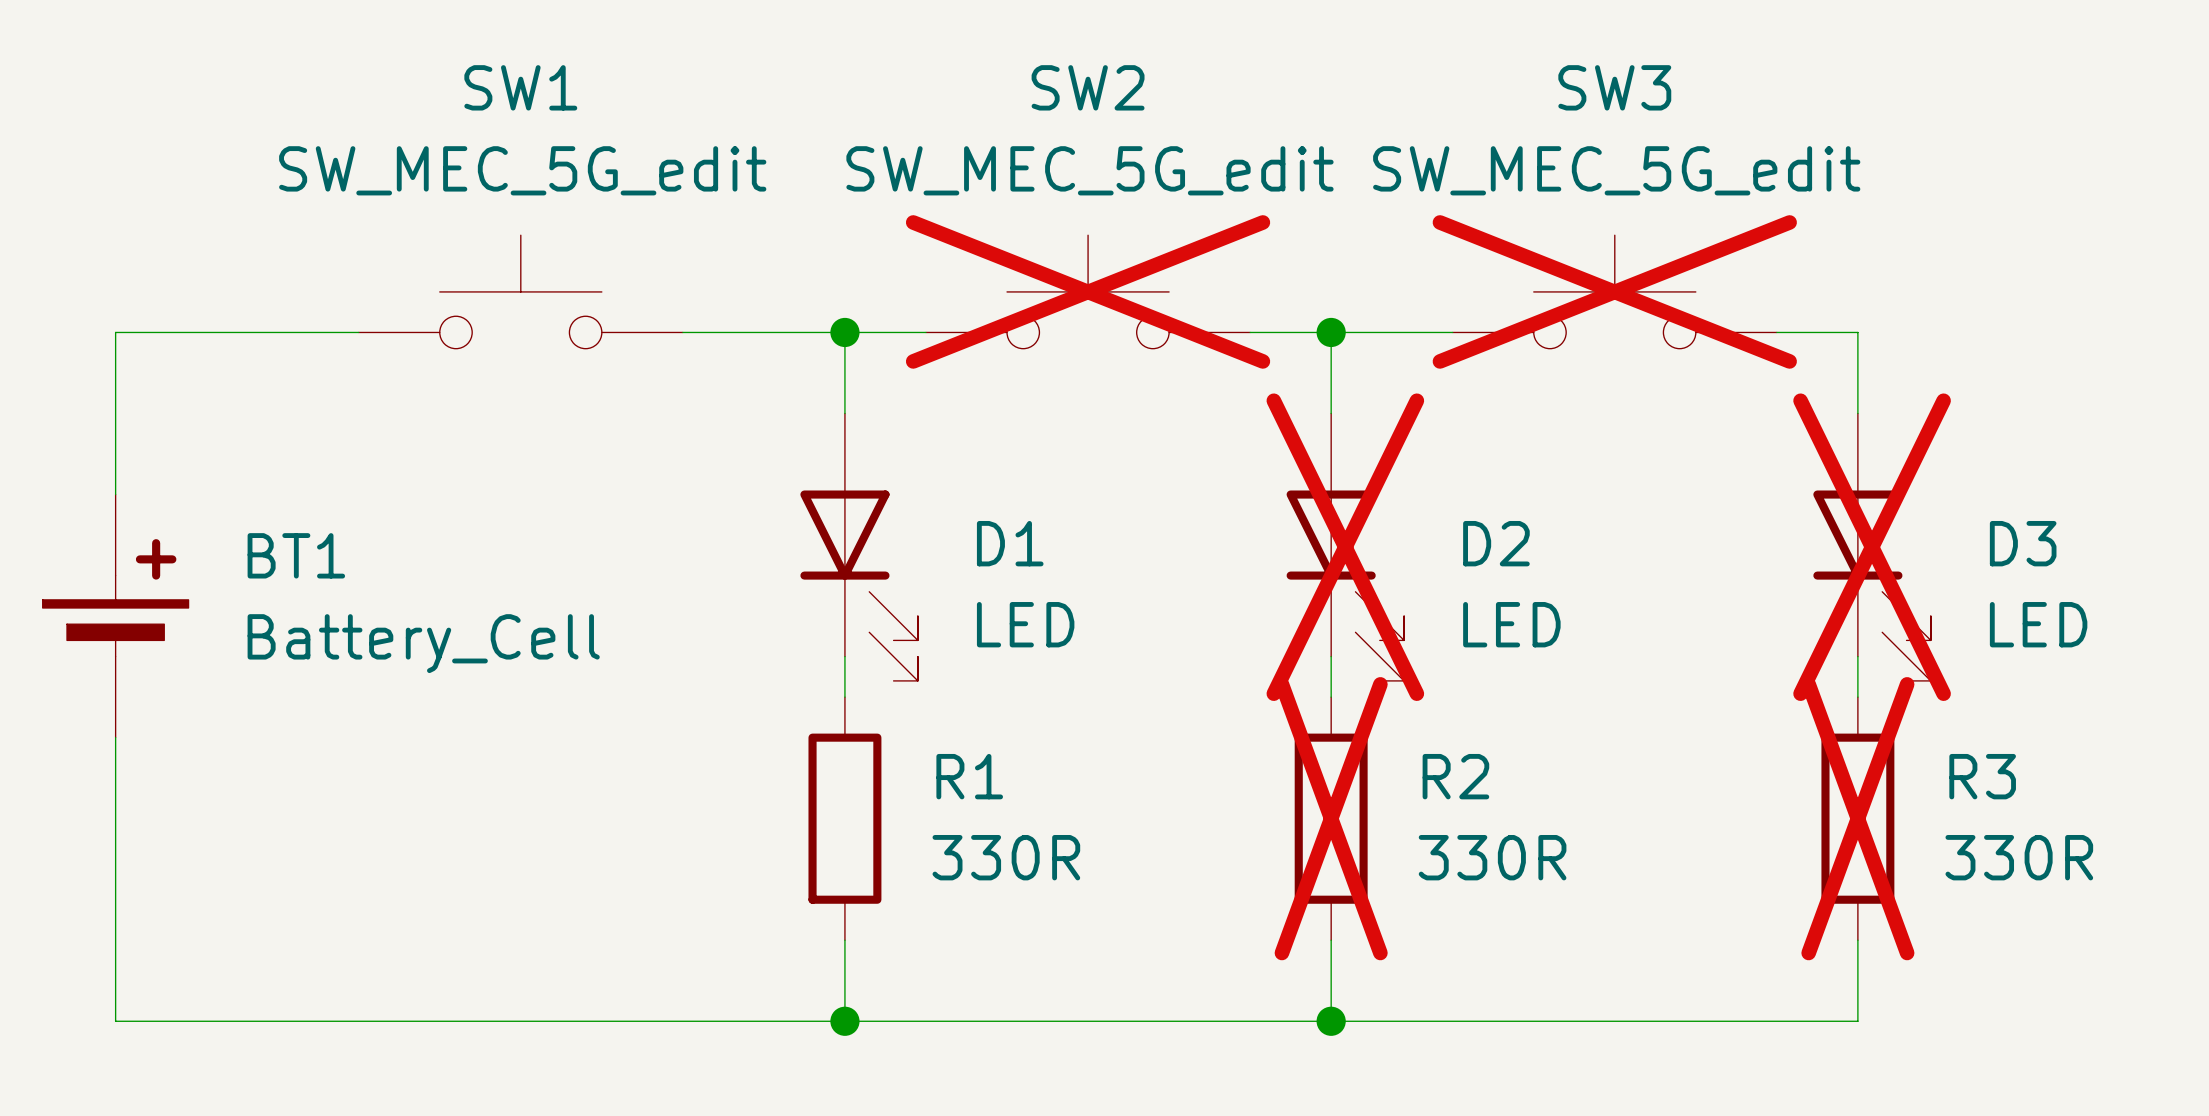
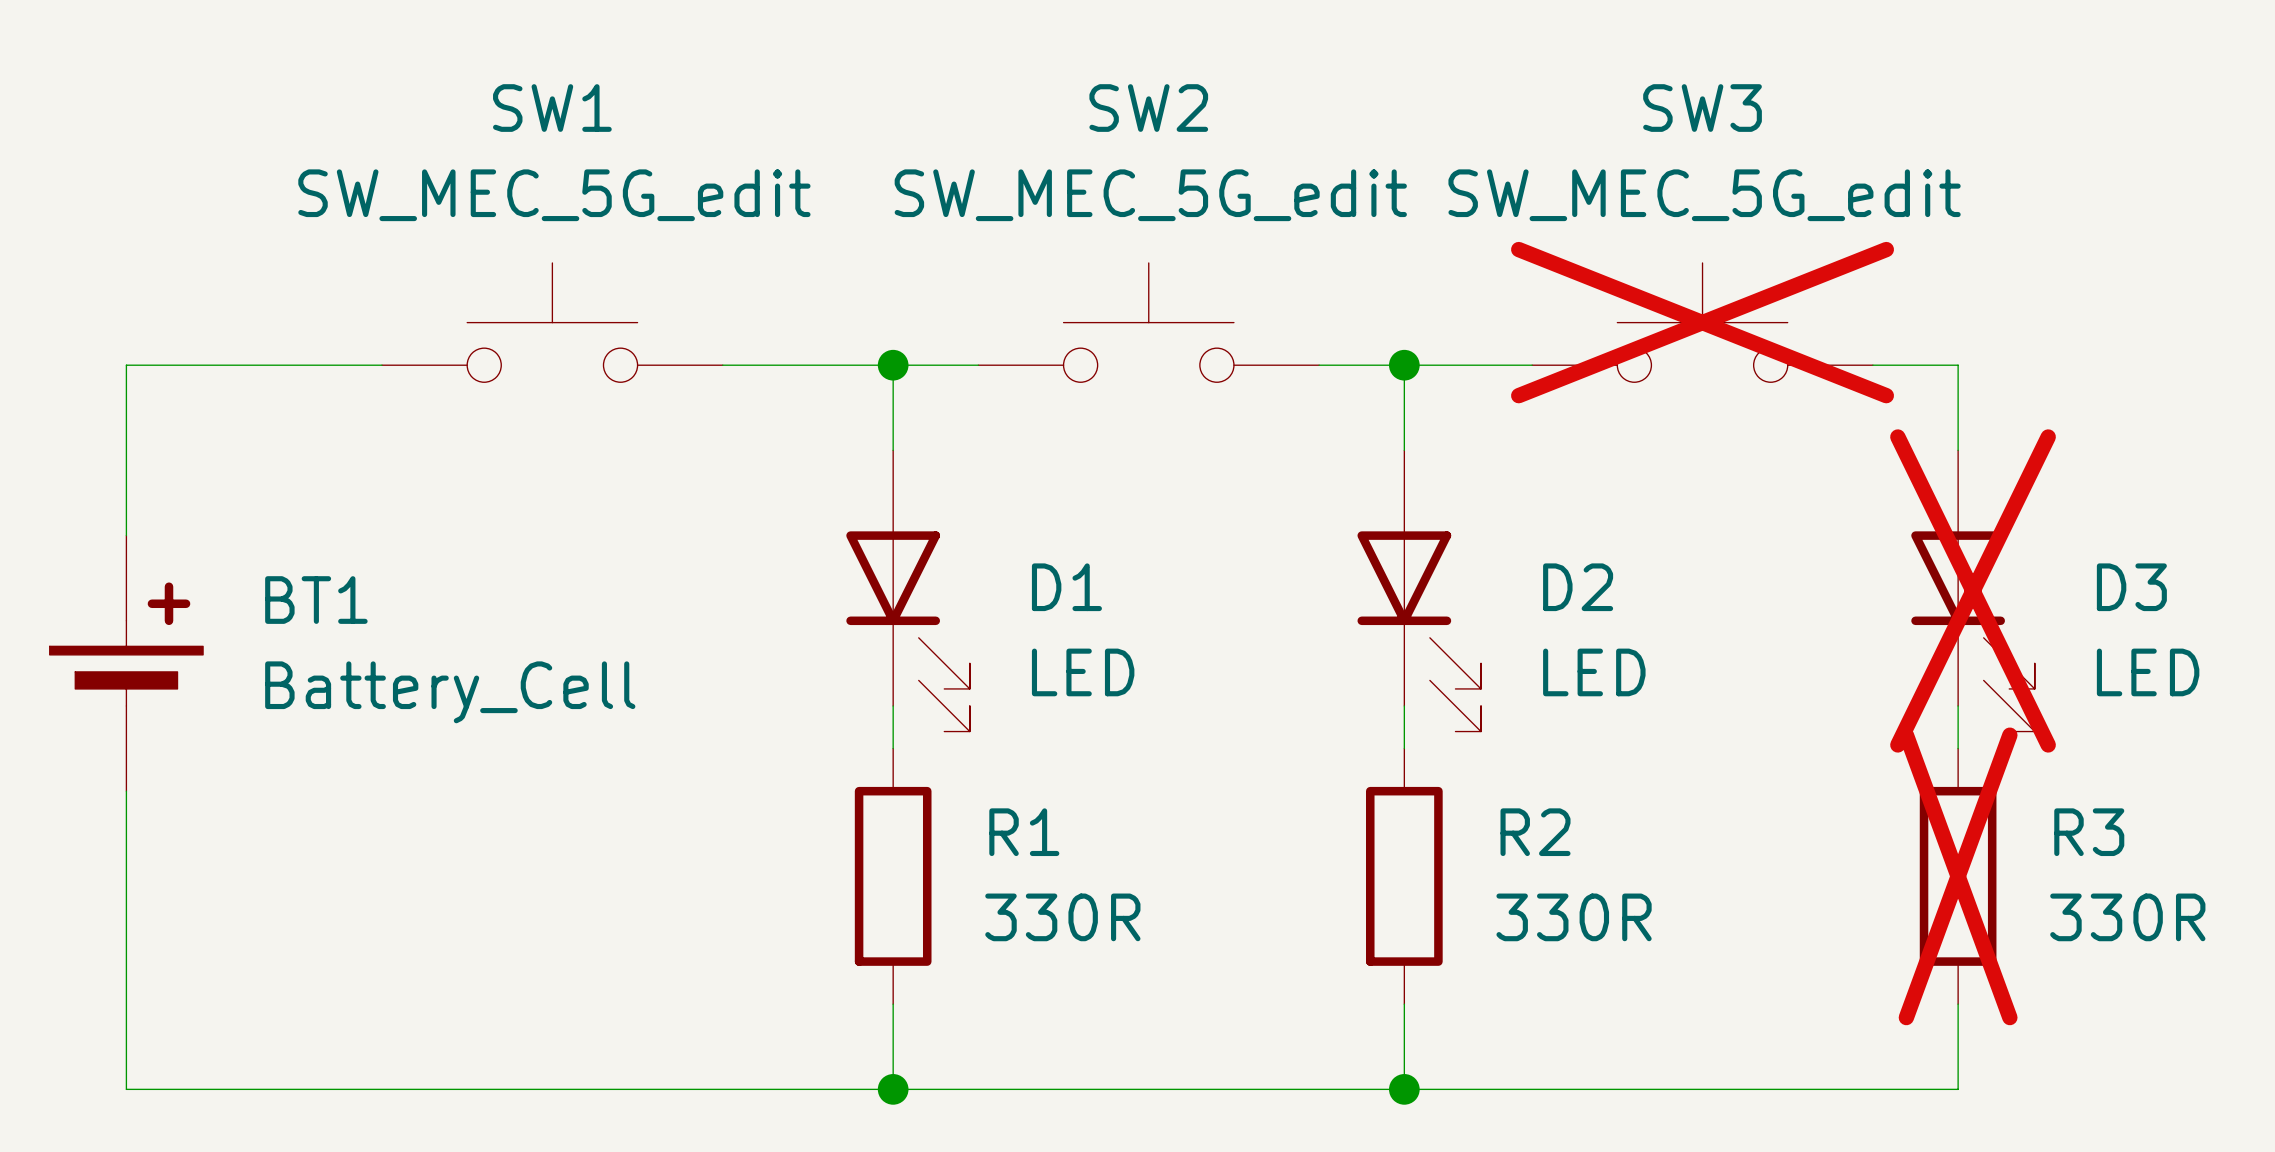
SW2 do-not-place cross: (1088, 291) -> none
D2 do-not-place cross: (1345, 547) -> none
R2 do-not-place cross: (1331, 818) -> none

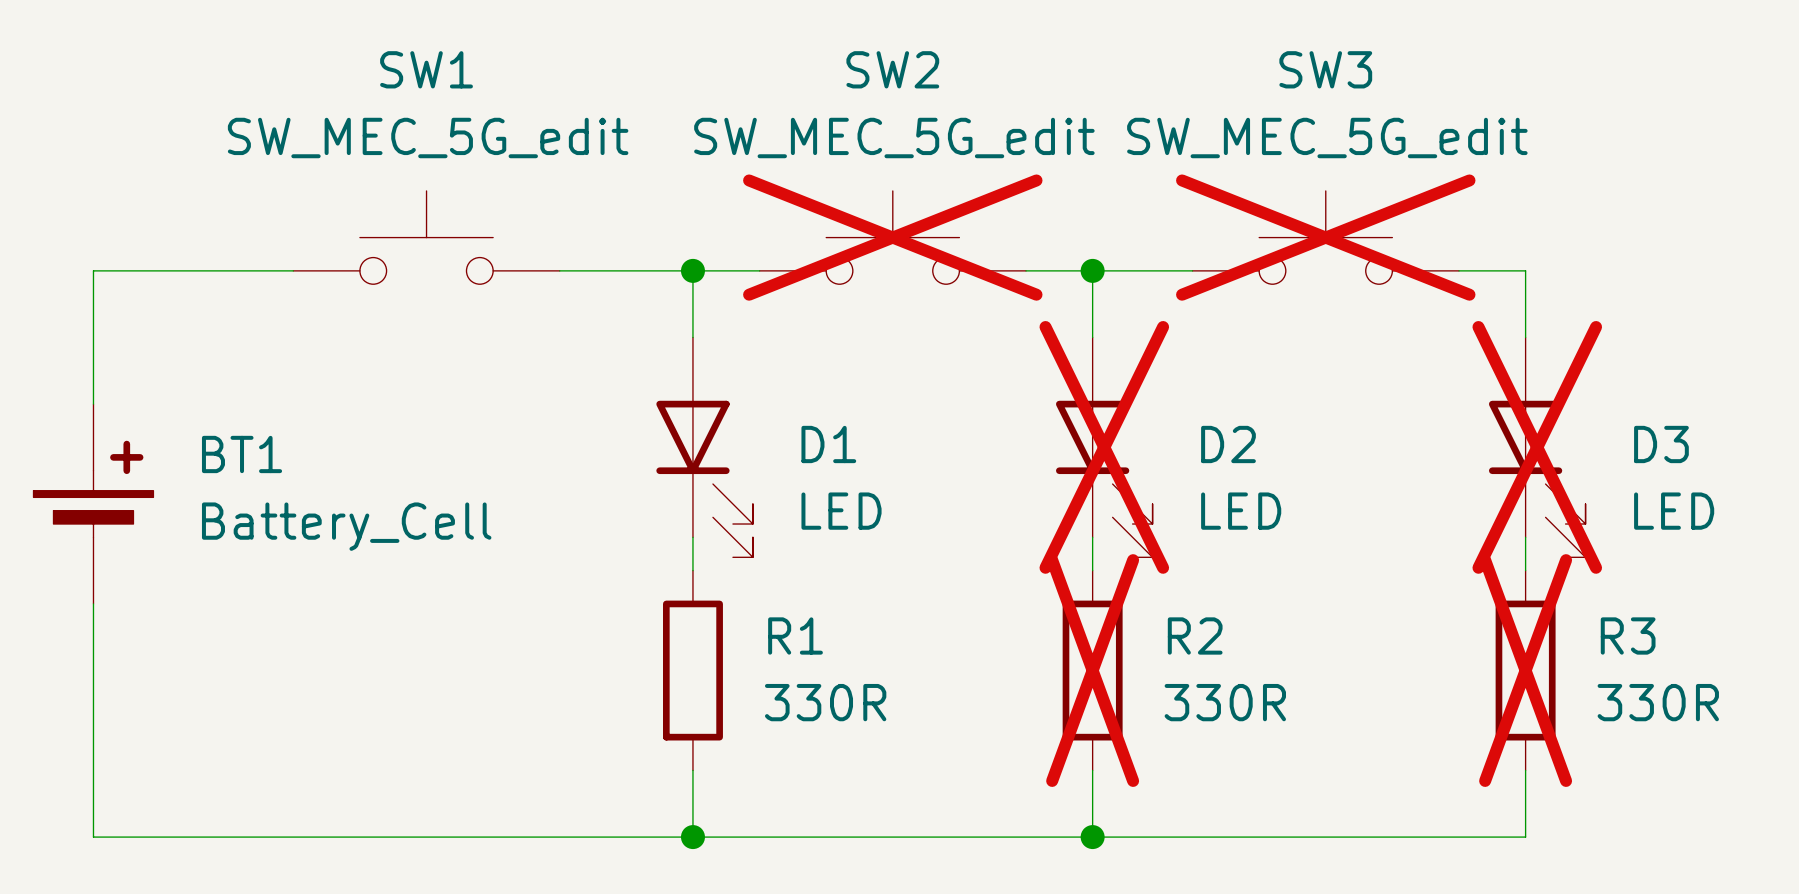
SW2 do-not-place cross: none -> (892, 237)
D2 do-not-place cross: none -> (1104, 447)
R2 do-not-place cross: none -> (1092, 670)

